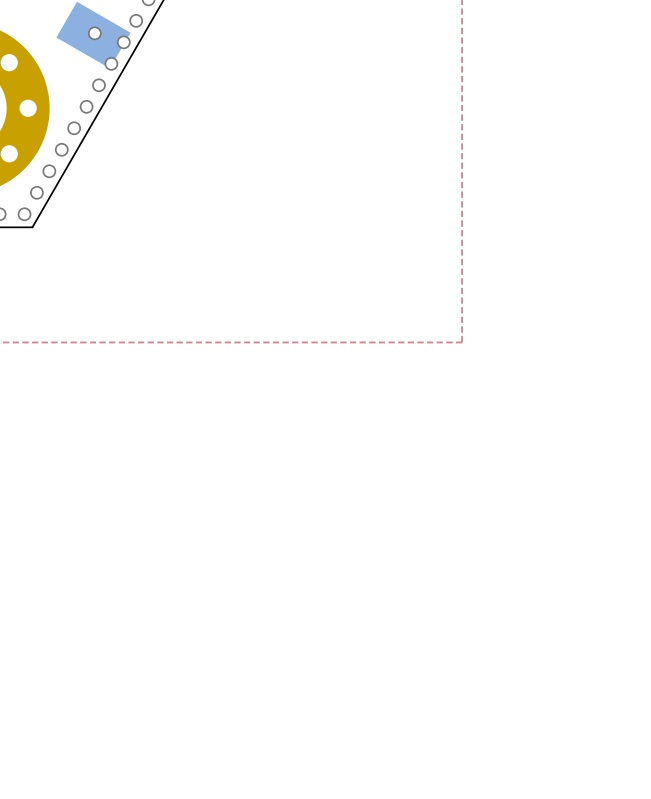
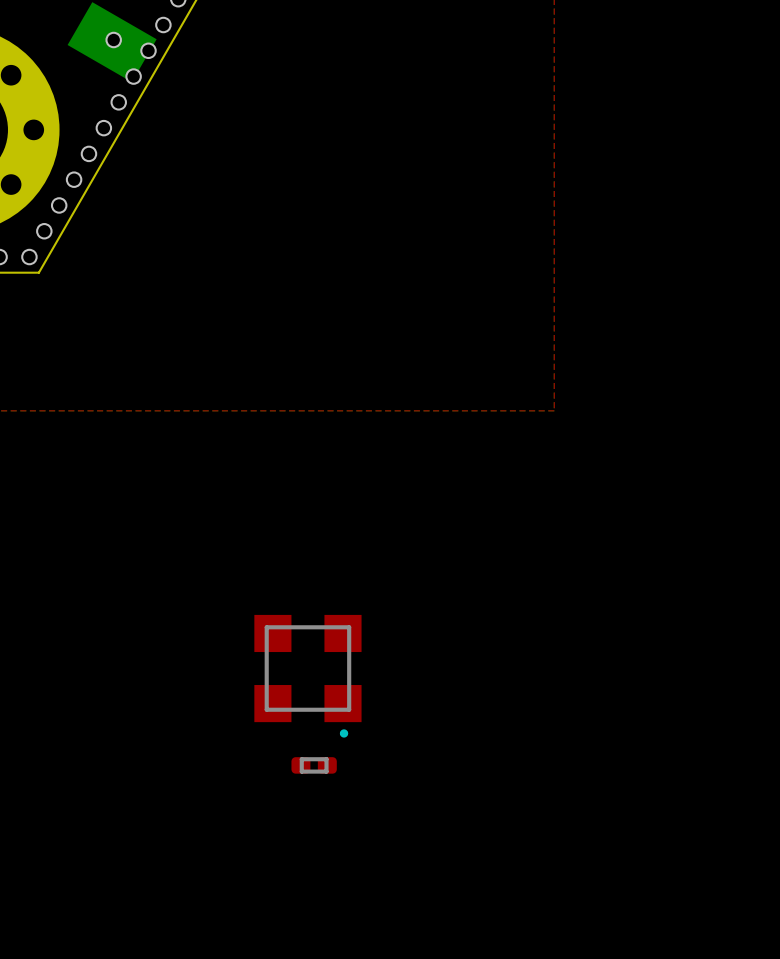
part: none -> (307, 676)
part: none -> (314, 765)

